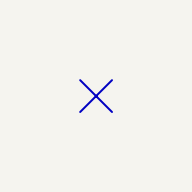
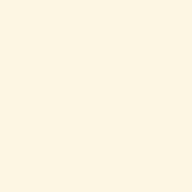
no-connect mark: (96, 96) -> none

